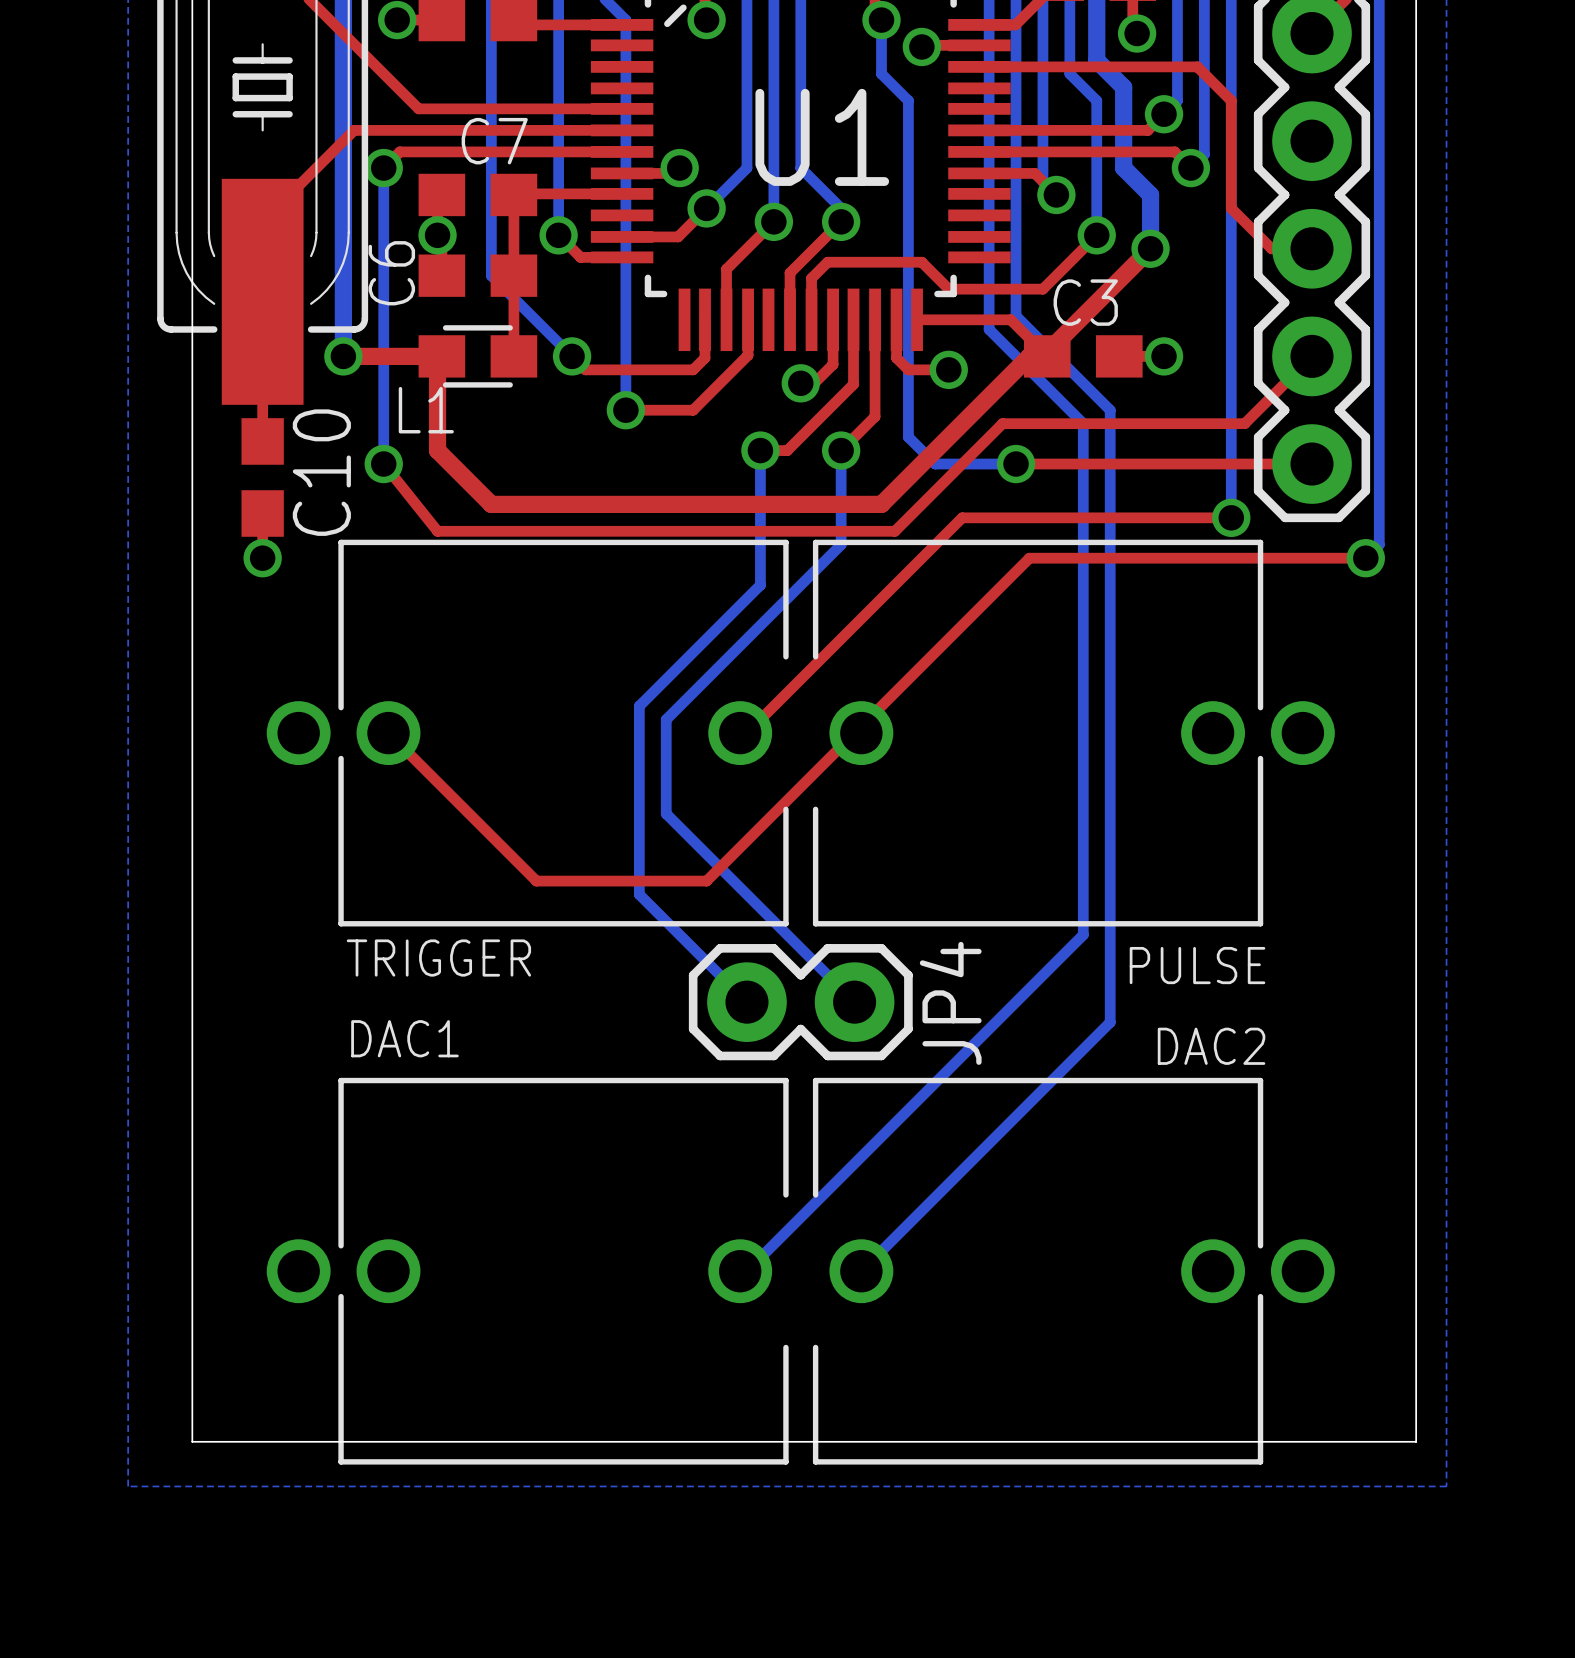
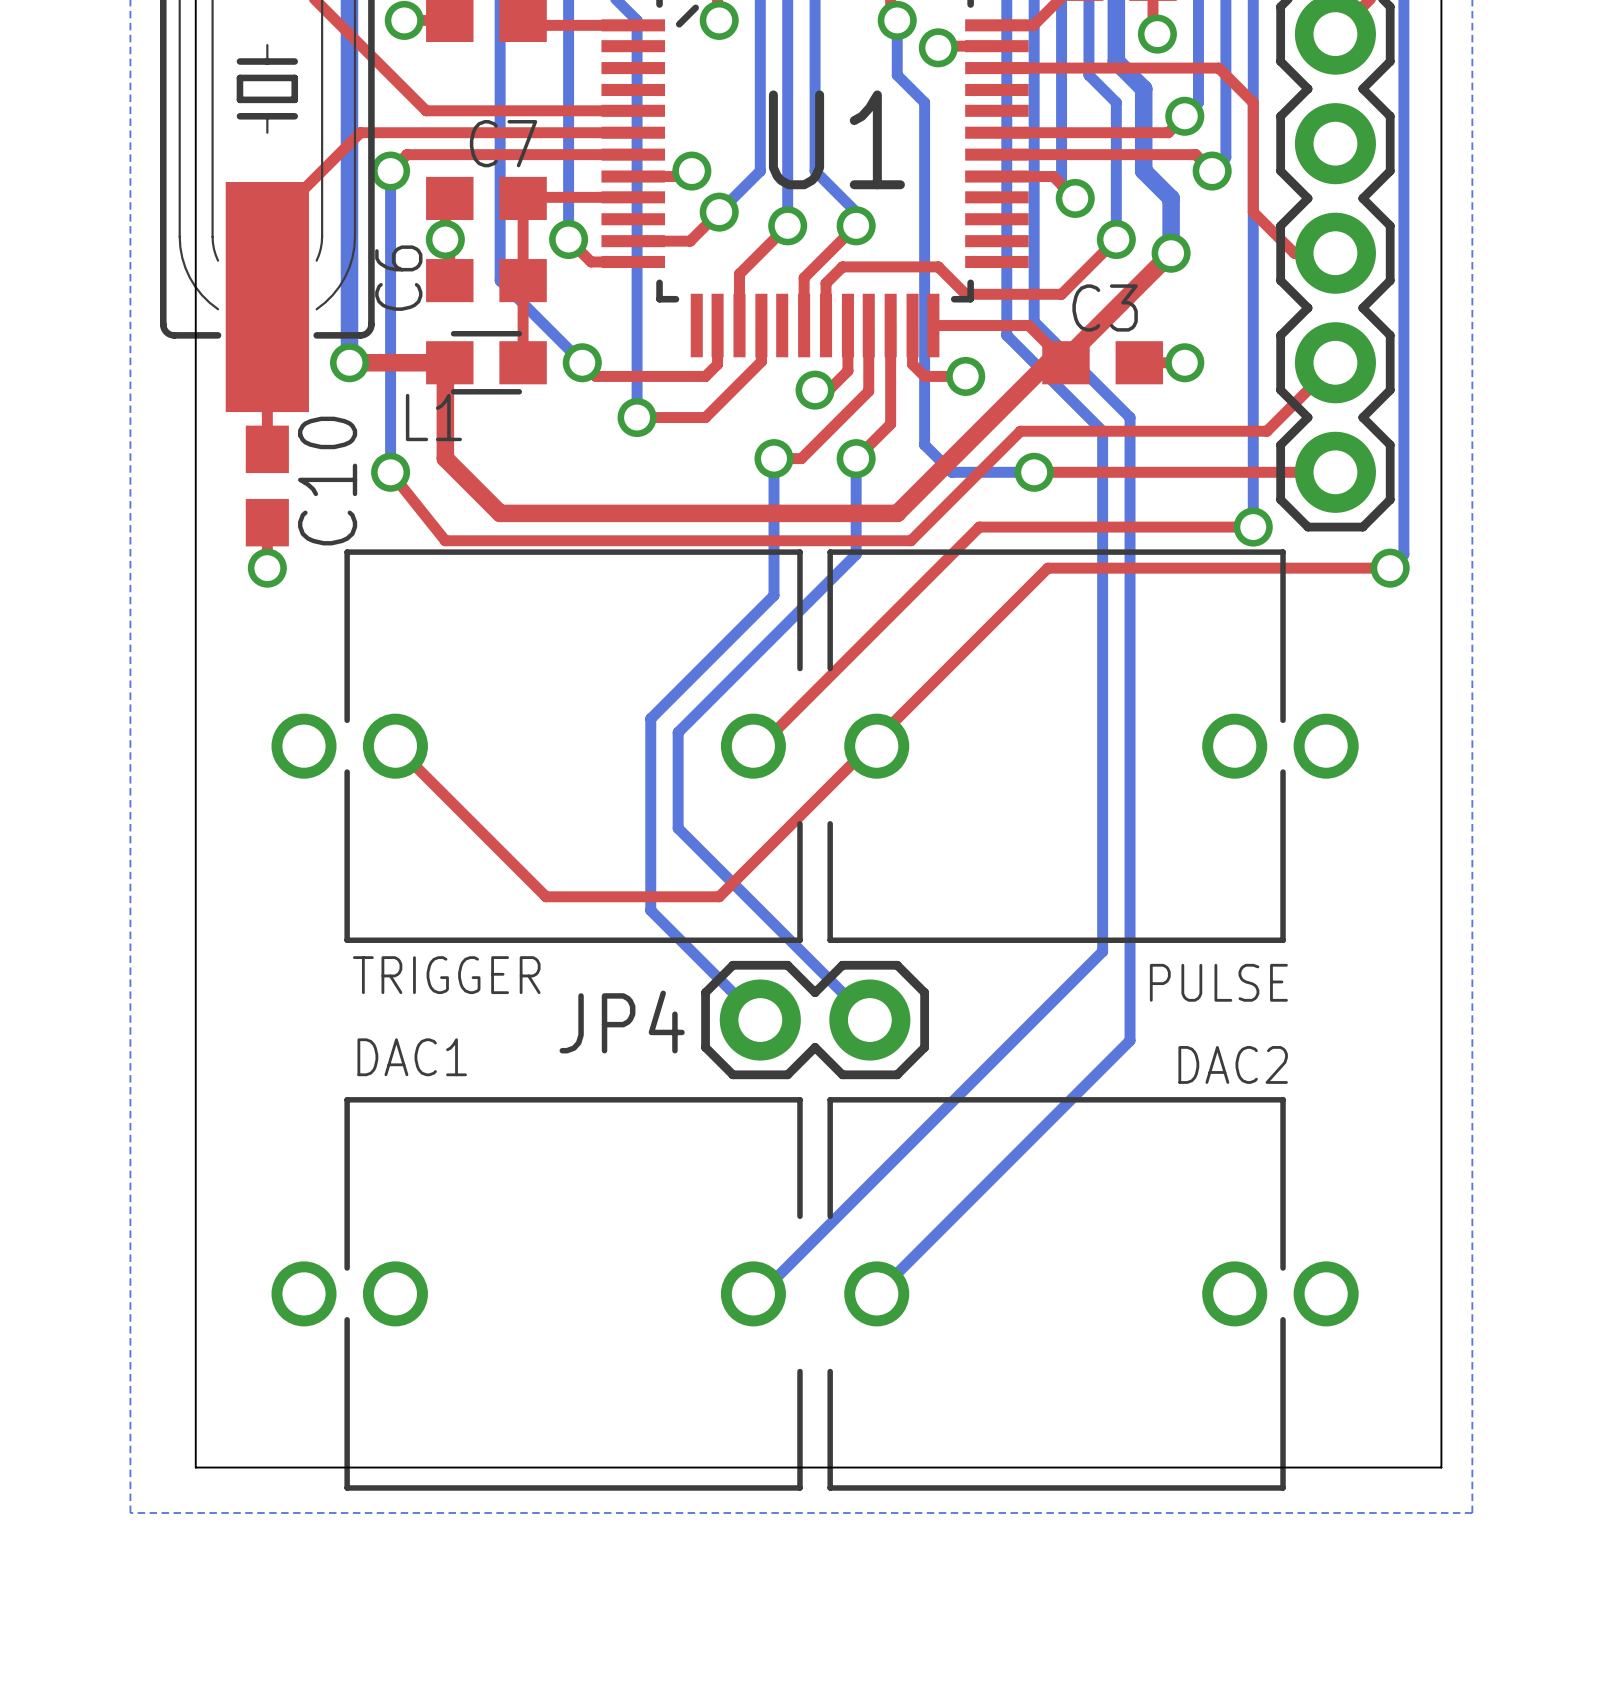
JP4 name rotation: 0° (950, 1003) -> 90° clockwise (622, 1022)
JP4 name position: JP4 (950, 1003) -> JP4 (622, 1022)

